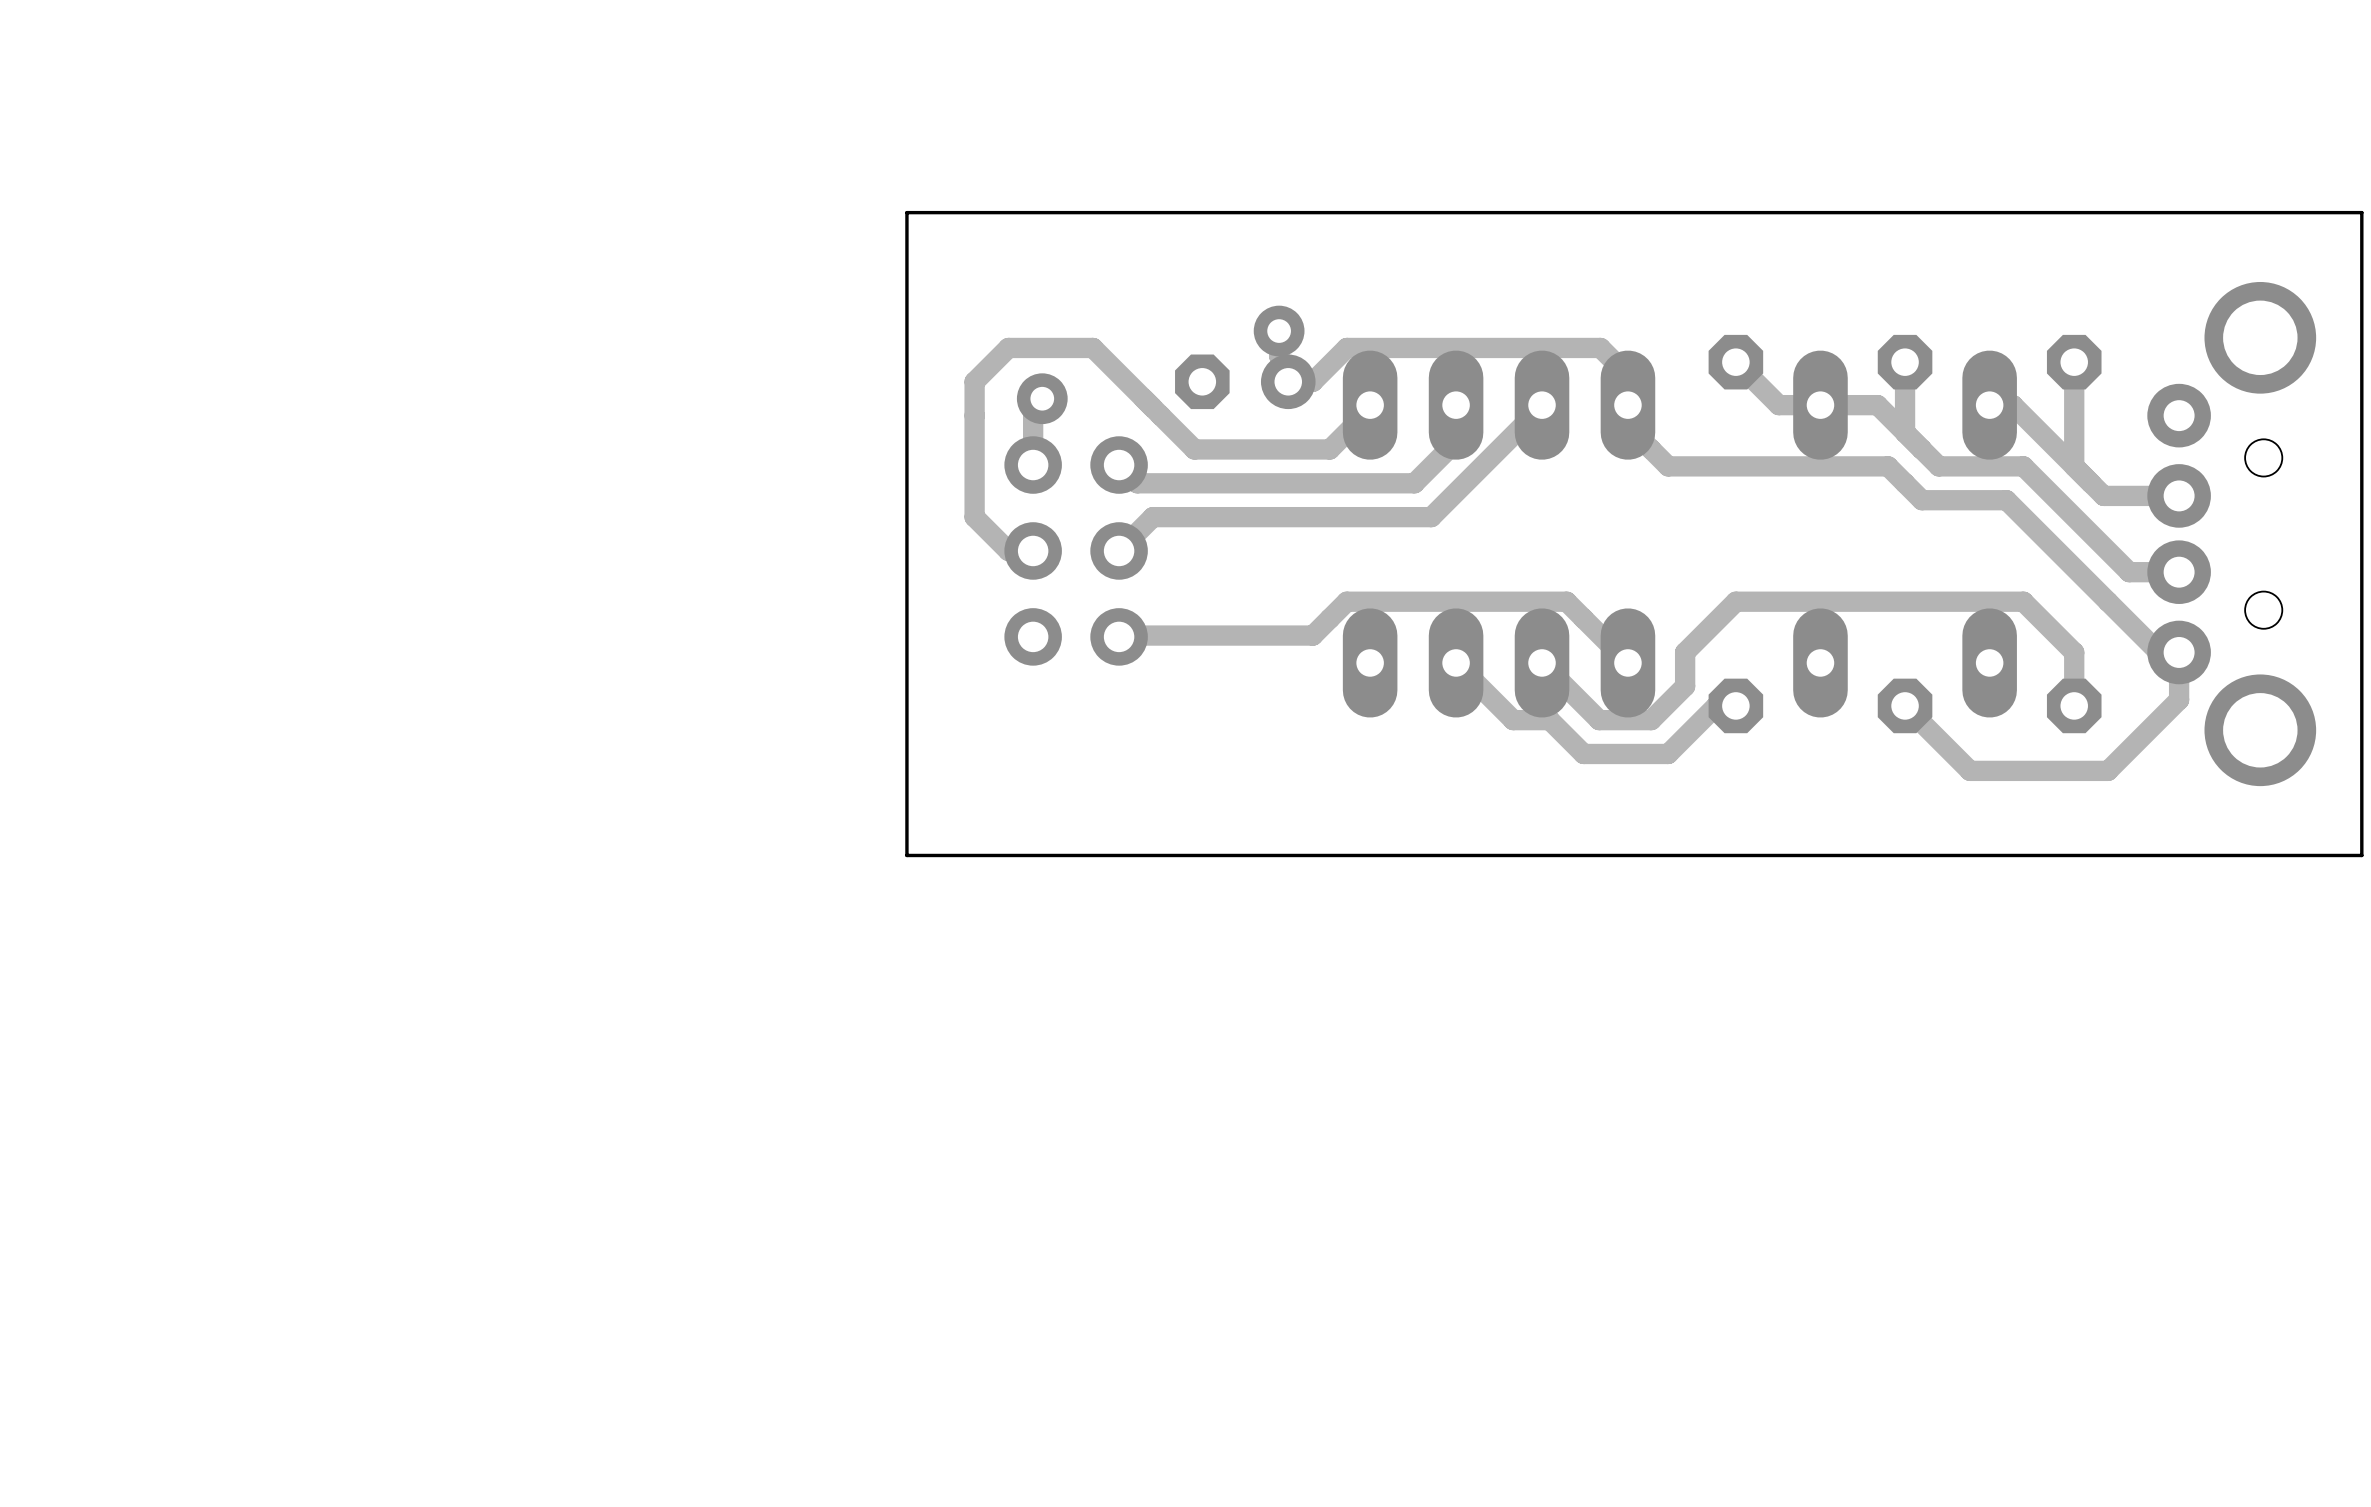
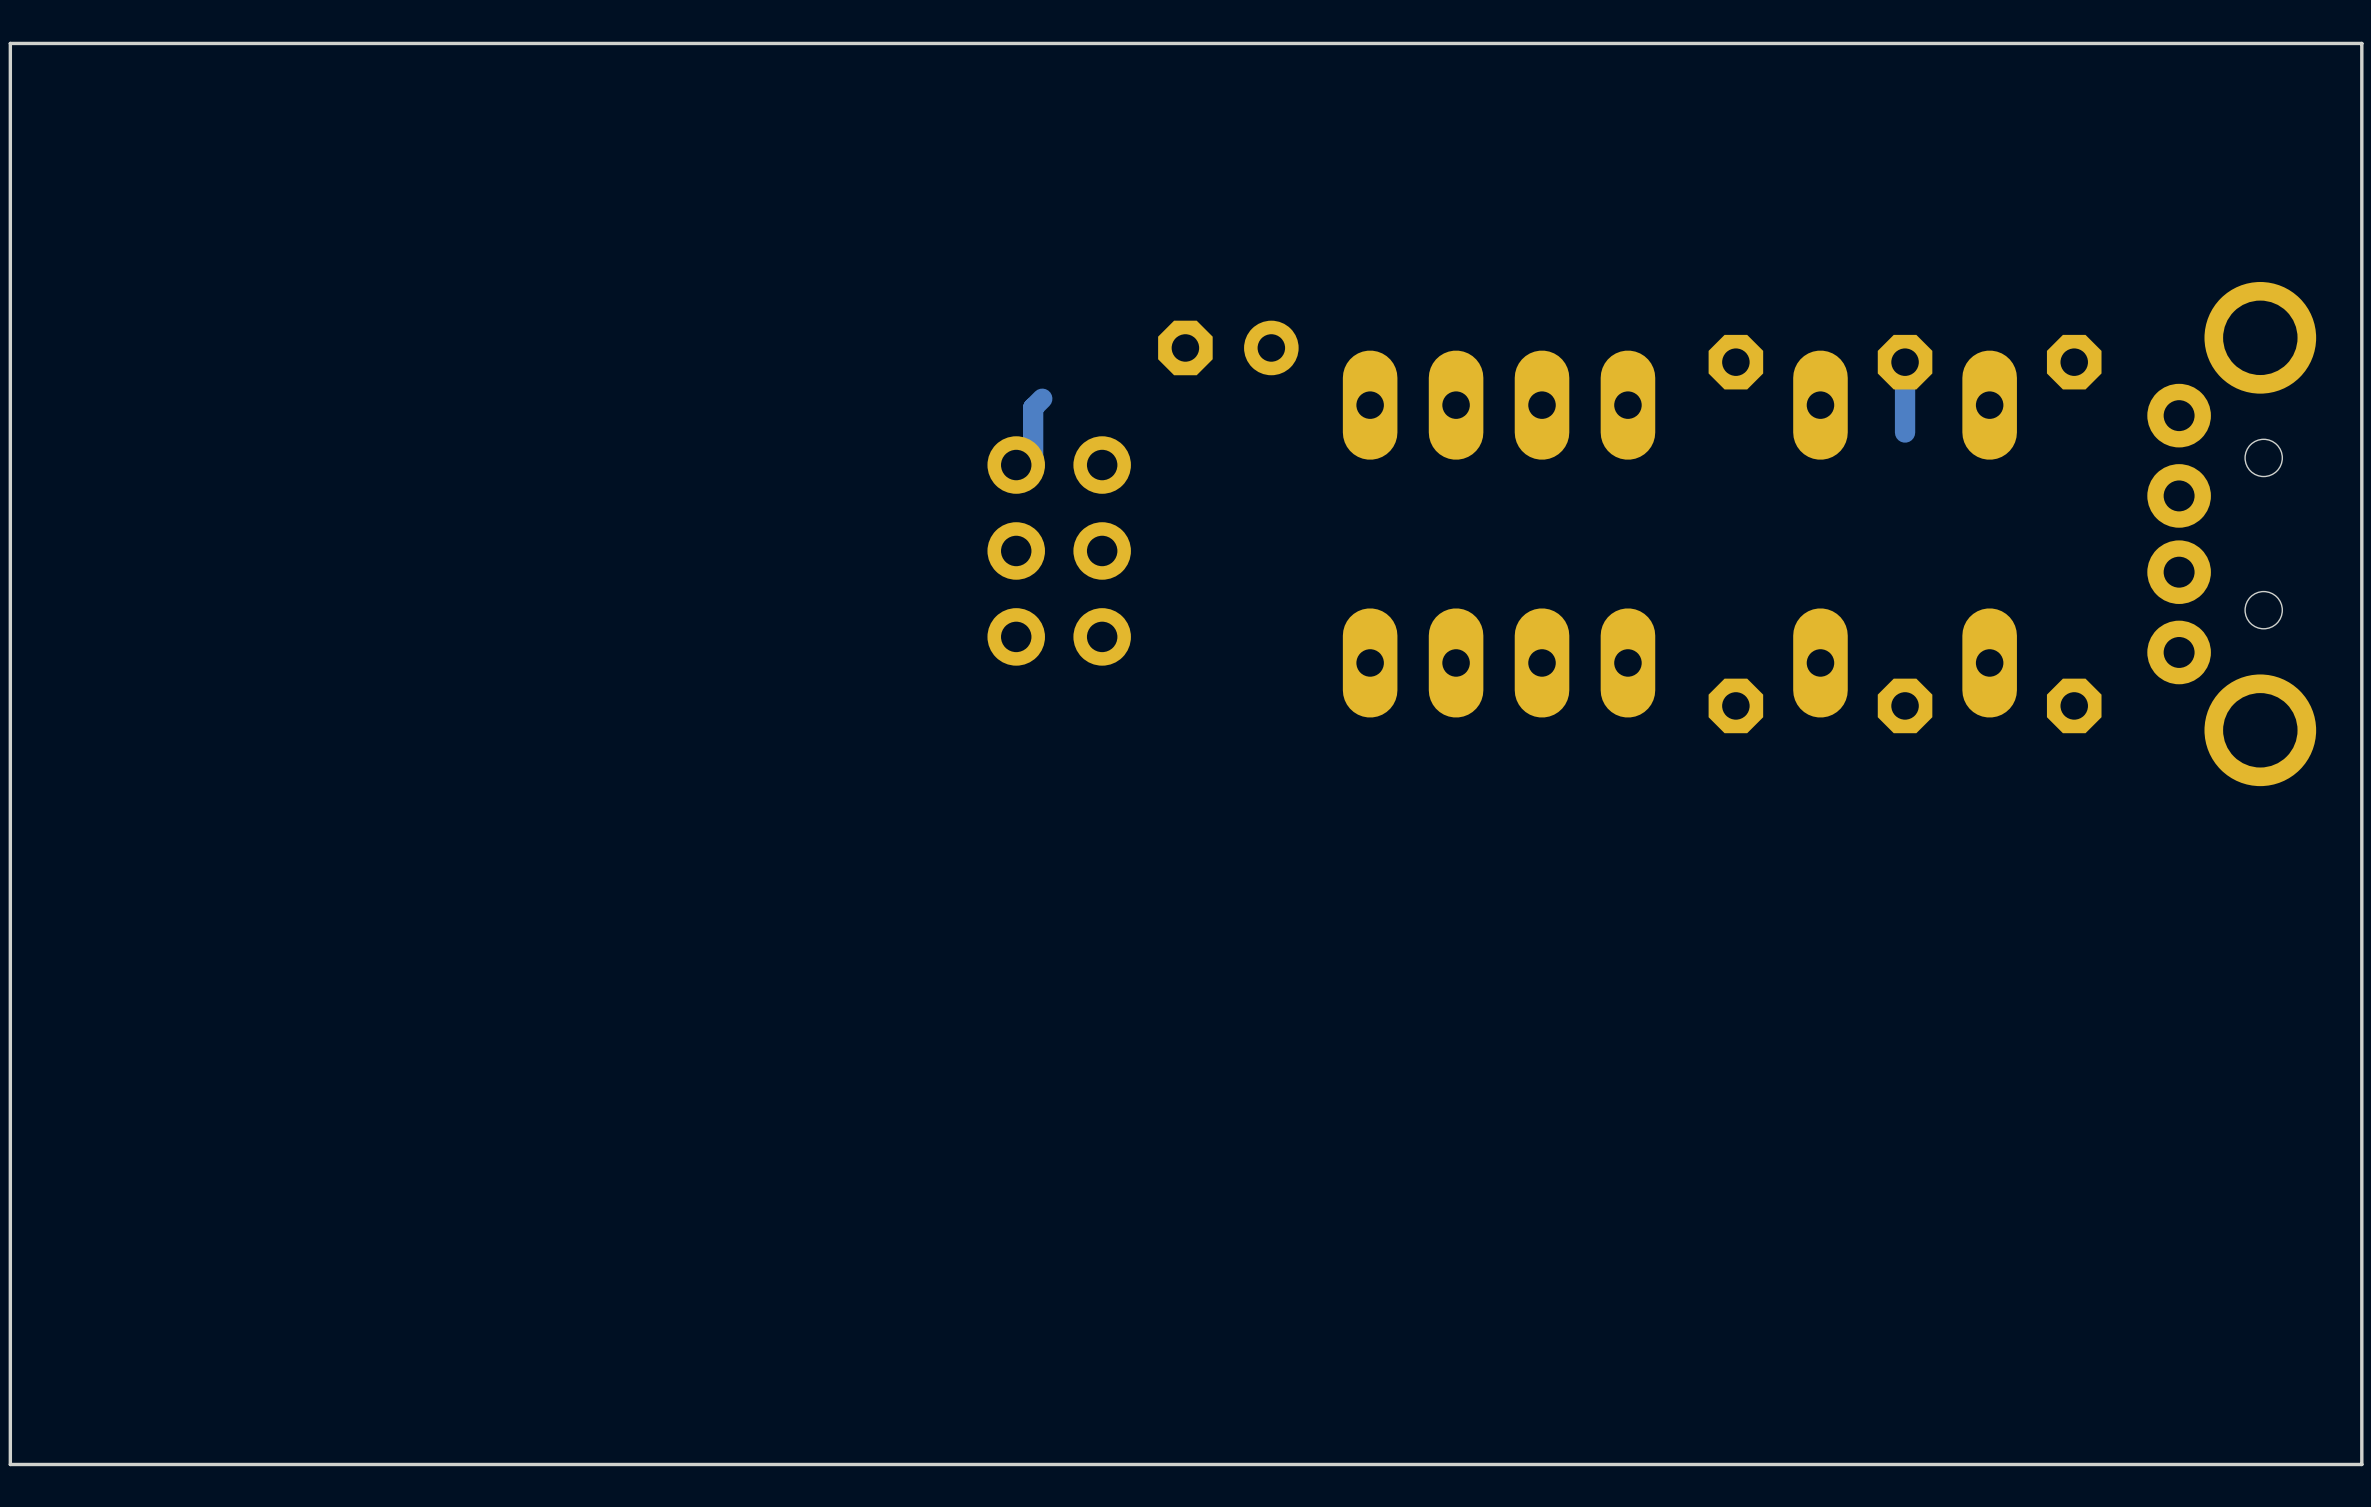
board edge: (2361, 212) (906, 212) (906, 855) (2361, 855) -> (2361, 212) (2361, 43) (10, 43) (10, 1464) (2361, 1464) (2361, 855)
track: (1279, 331) (1279, 355) (1288, 381) (1312, 381) (1346, 347) (1600, 347) (1627, 375) (1627, 426) (1668, 466) (1888, 466) (1921, 500) (2006, 500) (2158, 652) (2179, 652) (2179, 699) (2108, 770) (1970, 770) (1905, 705) -> none
via: (1279, 331) -> none
track: (1735, 362) (1778, 405) (1877, 405) (1938, 466) (2023, 466) (2129, 572) (2179, 572) -> none
track: (2074, 362) (2074, 466) -> none
part position: (1245, 381) -> (1228, 347)
via: (1042, 398) -> none
track: (1370, 405) (1370, 409) (1329, 449) (1194, 449) (1093, 347) (1008, 347) (974, 381) (974, 517) (1008, 550) (1033, 550) -> none
track: (1456, 405) (1456, 441) (1414, 483) (1137, 483) (1119, 465) -> none
track: (1542, 405) (1431, 517) (1152, 517) (1119, 550) -> none
track: (1989, 405) (2012, 405) (2103, 495) (2179, 495) -> none
part position: (1076, 550) -> (1059, 550)
track: (1119, 636) (1312, 635) (1346, 601) (1566, 601) (1627, 662) -> none
track: (1456, 662) (1513, 720) (1549, 720) (1583, 753) (1668, 753) (1716, 705) (1735, 705) -> none
track: (1542, 662) (1599, 720) (1651, 720) (1685, 686) (1685, 652) (1735, 601) (2023, 601) (2074, 652) (2074, 705) -> none

